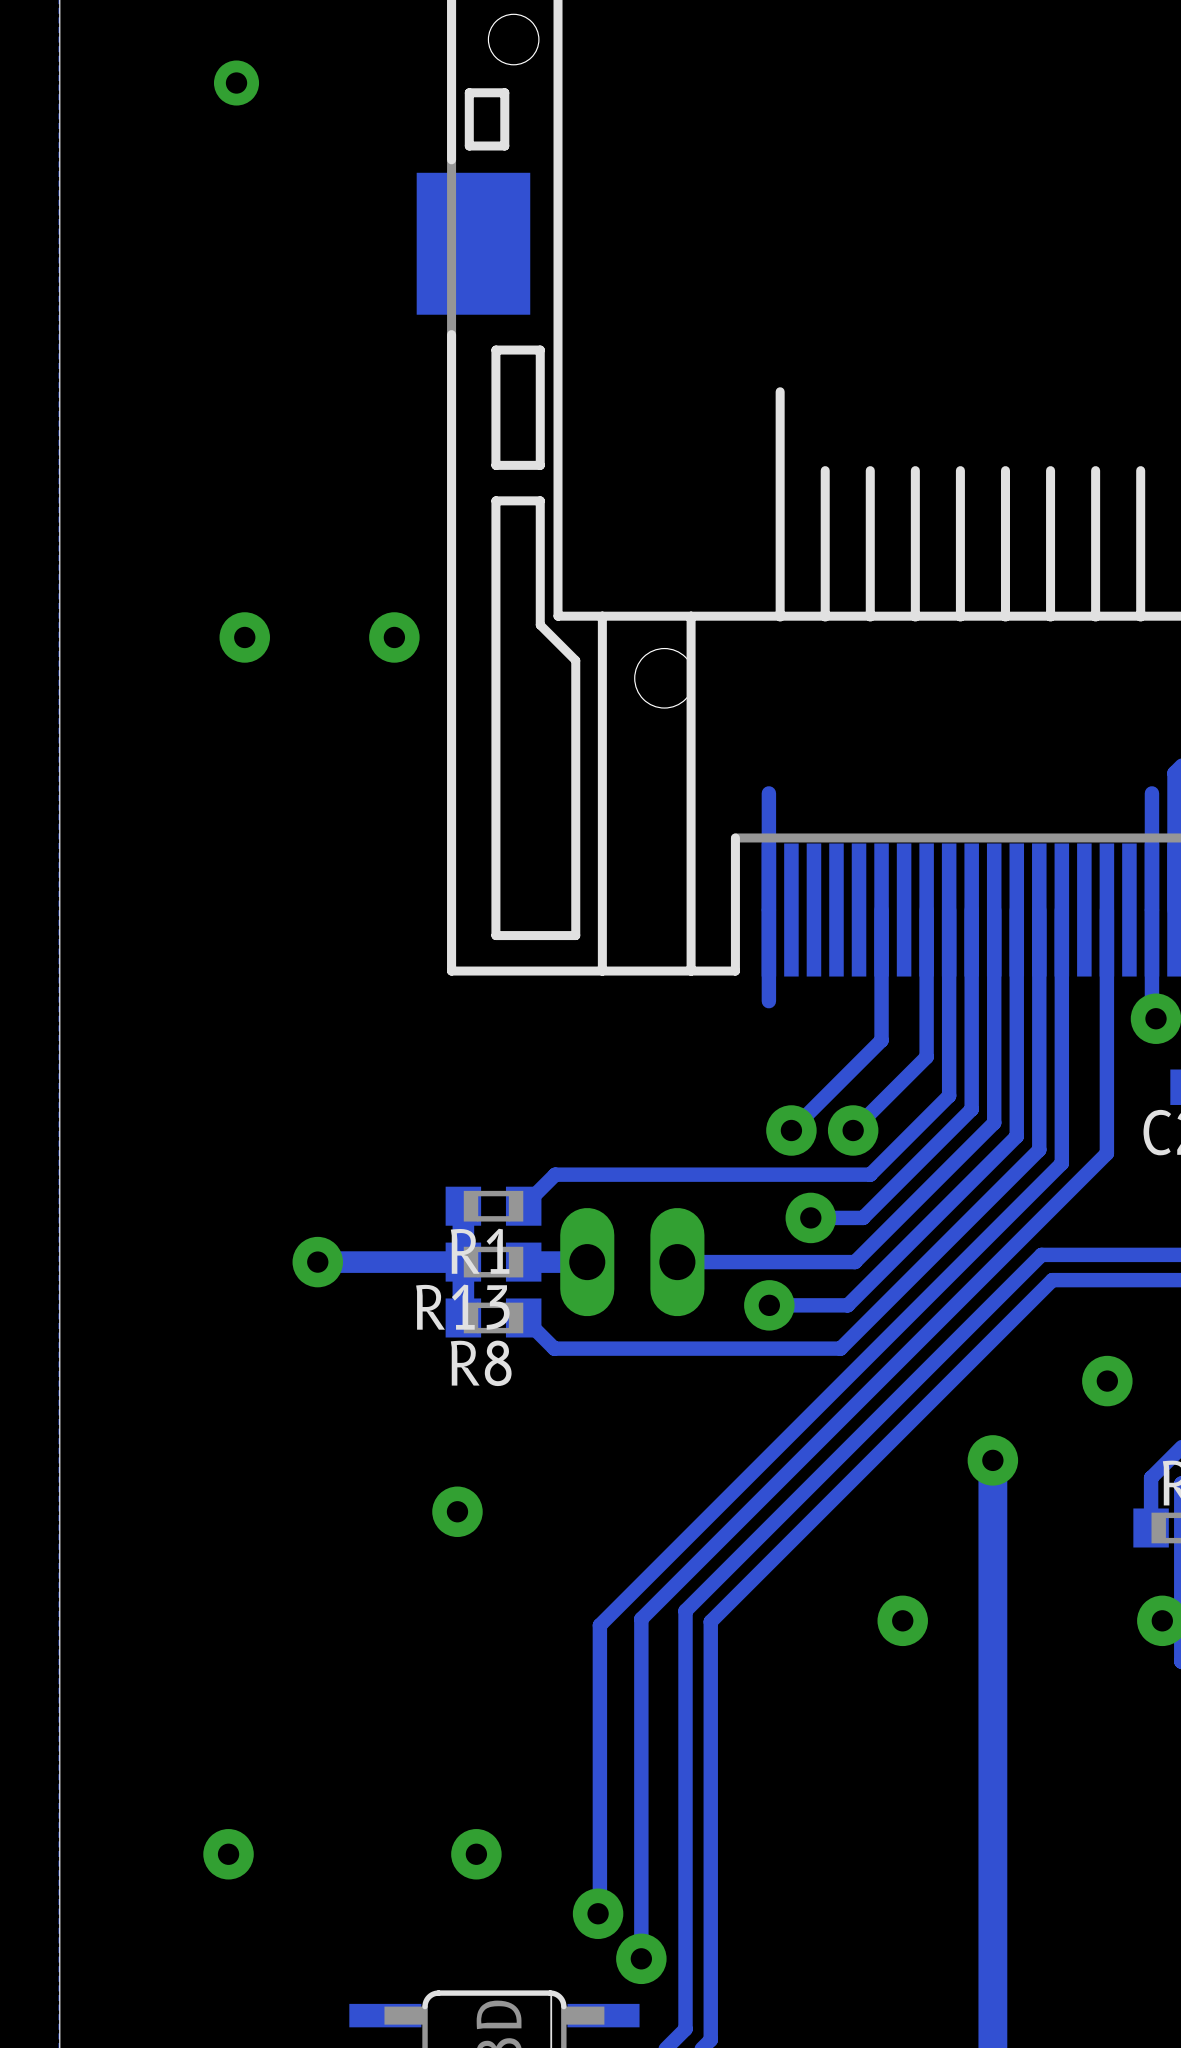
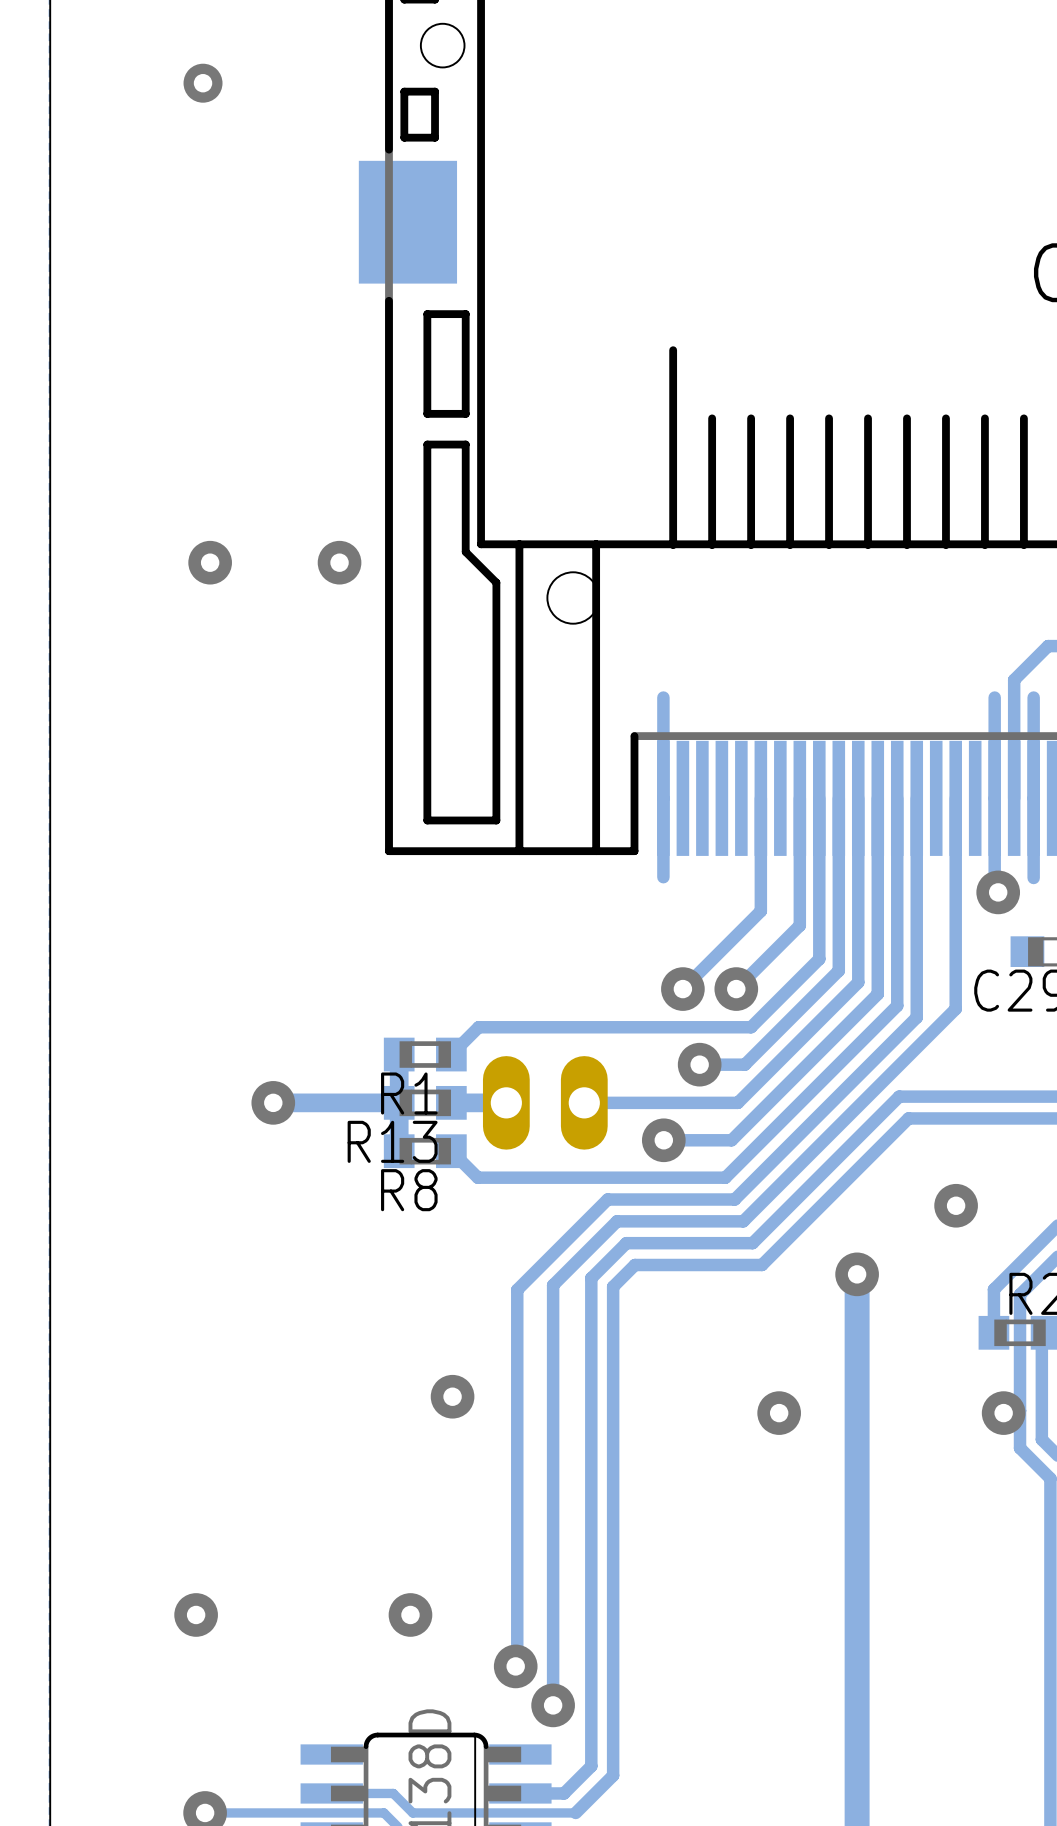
track: (851, 1373) (599, 1625) -> (734, 1199) (607, 1199) (517, 1289) (517, 1416)
track: (861, 1399) (641, 1619) -> (743, 1221) (617, 1221) (553, 1285) (553, 1411)
track: (872, 1424) (685, 1610) -> (752, 1243) (626, 1243) (591, 1278) (591, 1404)
track: (882, 1449) (710, 1621) -> (762, 1264) (634, 1264) (613, 1286) (613, 1413)
via position: (457, 1511) -> (452, 1396)

